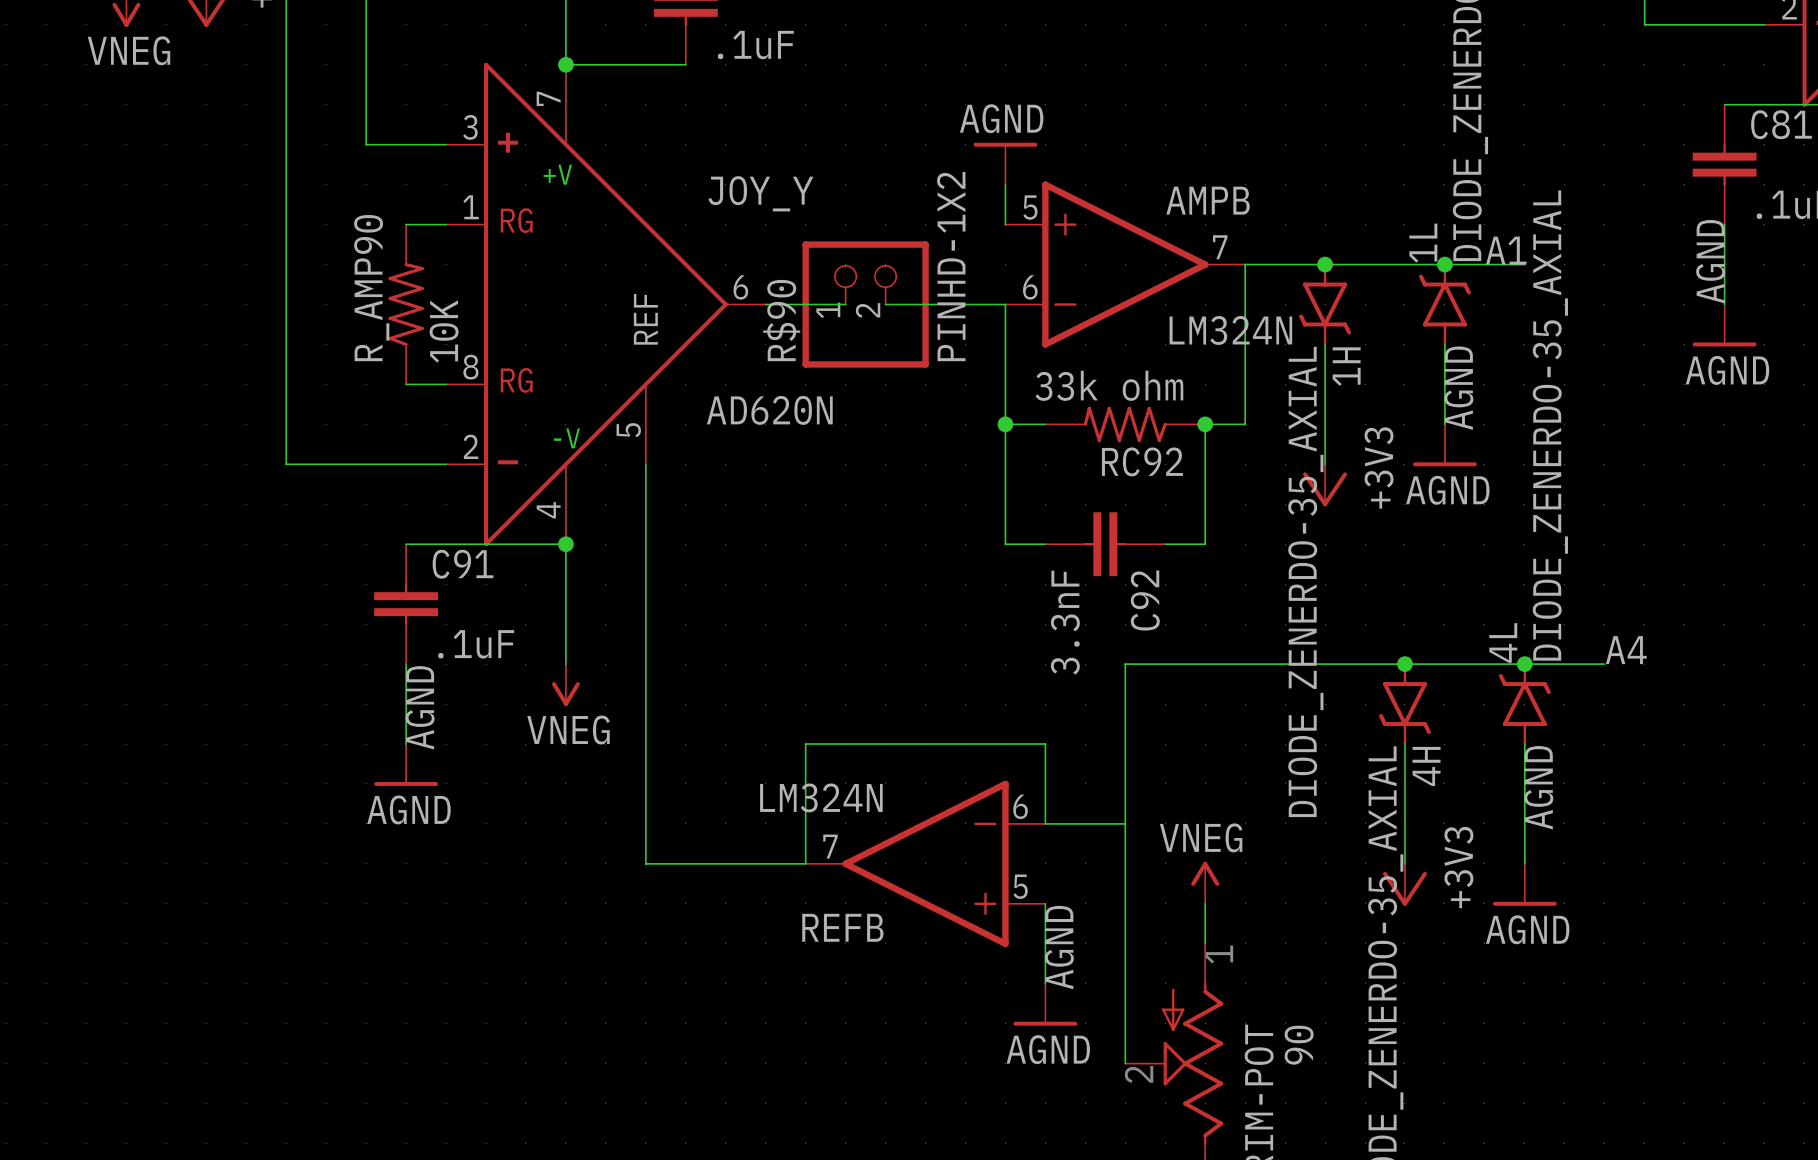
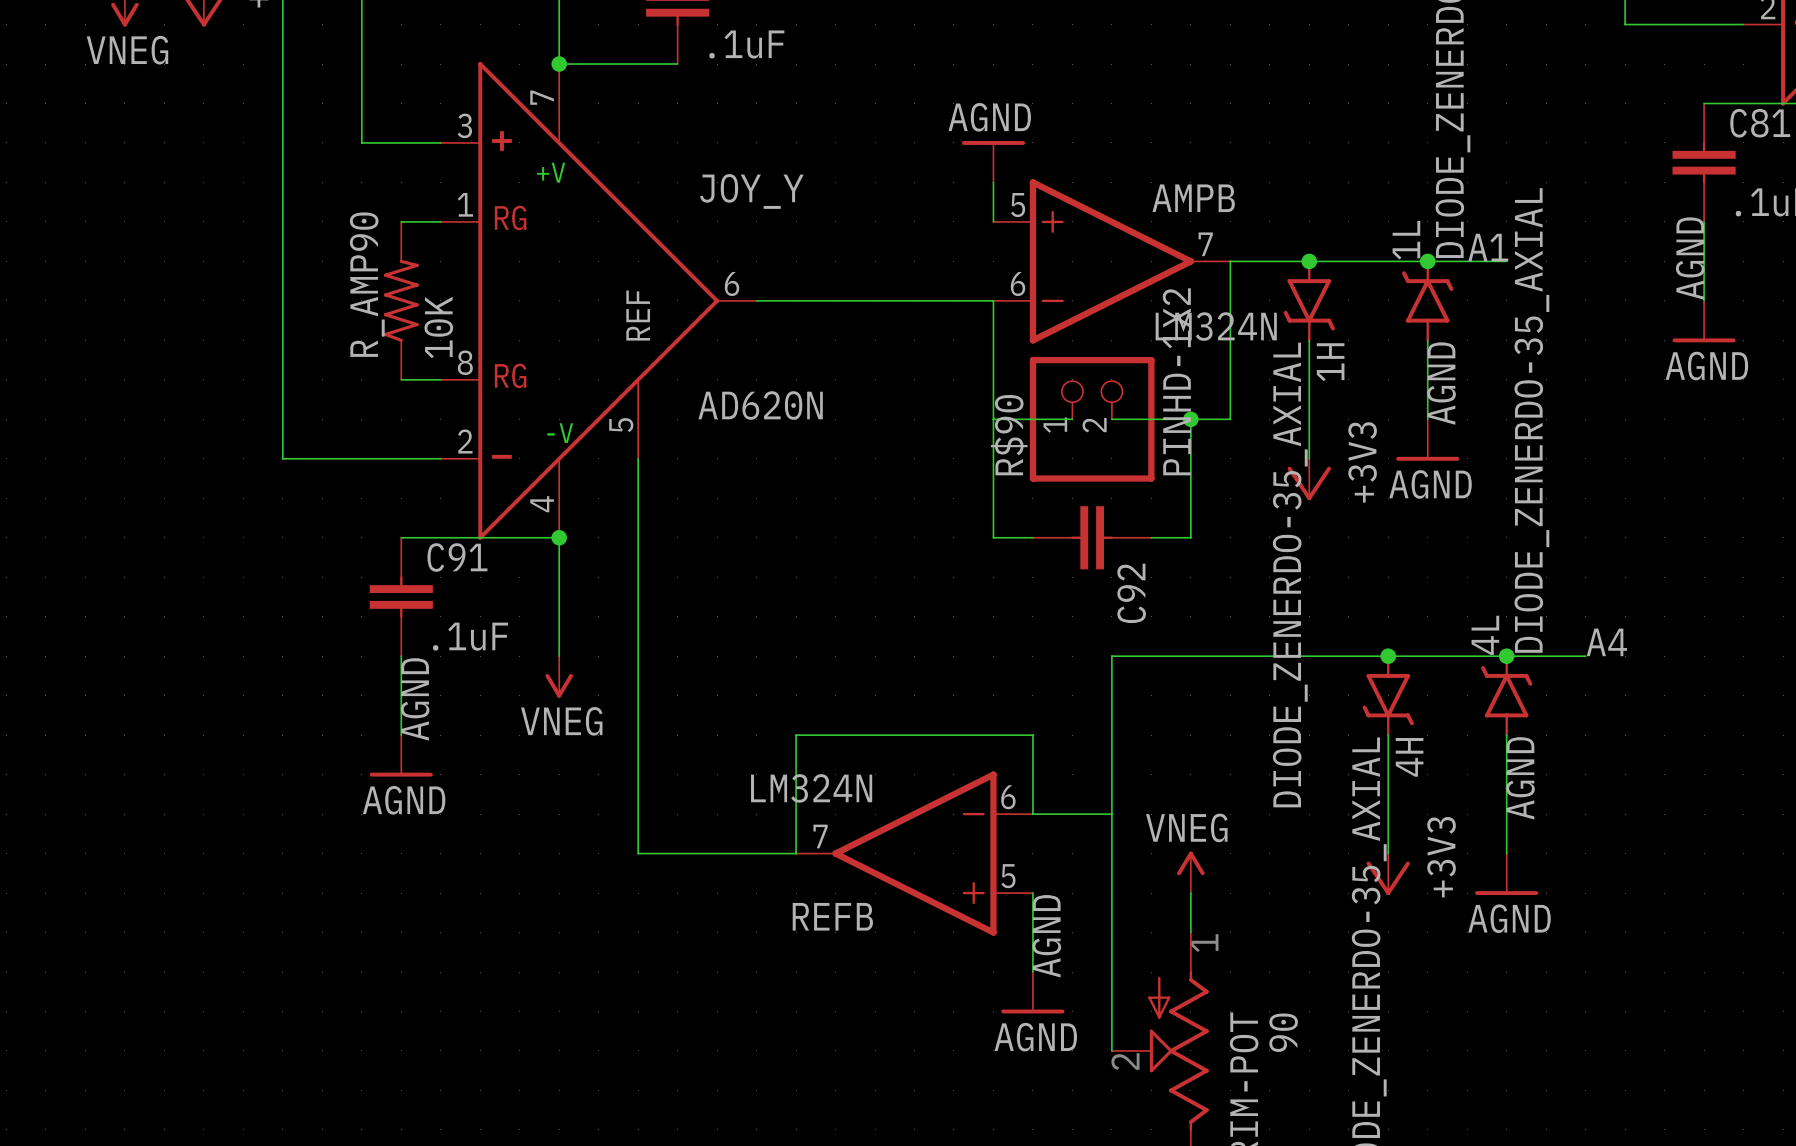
wire: none -> (835, 300) (875, 300)
R$90 position: (865, 304) -> (1092, 419)
junction: (1005, 424) -> none
RC92: 33k ohm (1125, 424) -> none
C92 value: 3.3nF (1065, 622) -> none

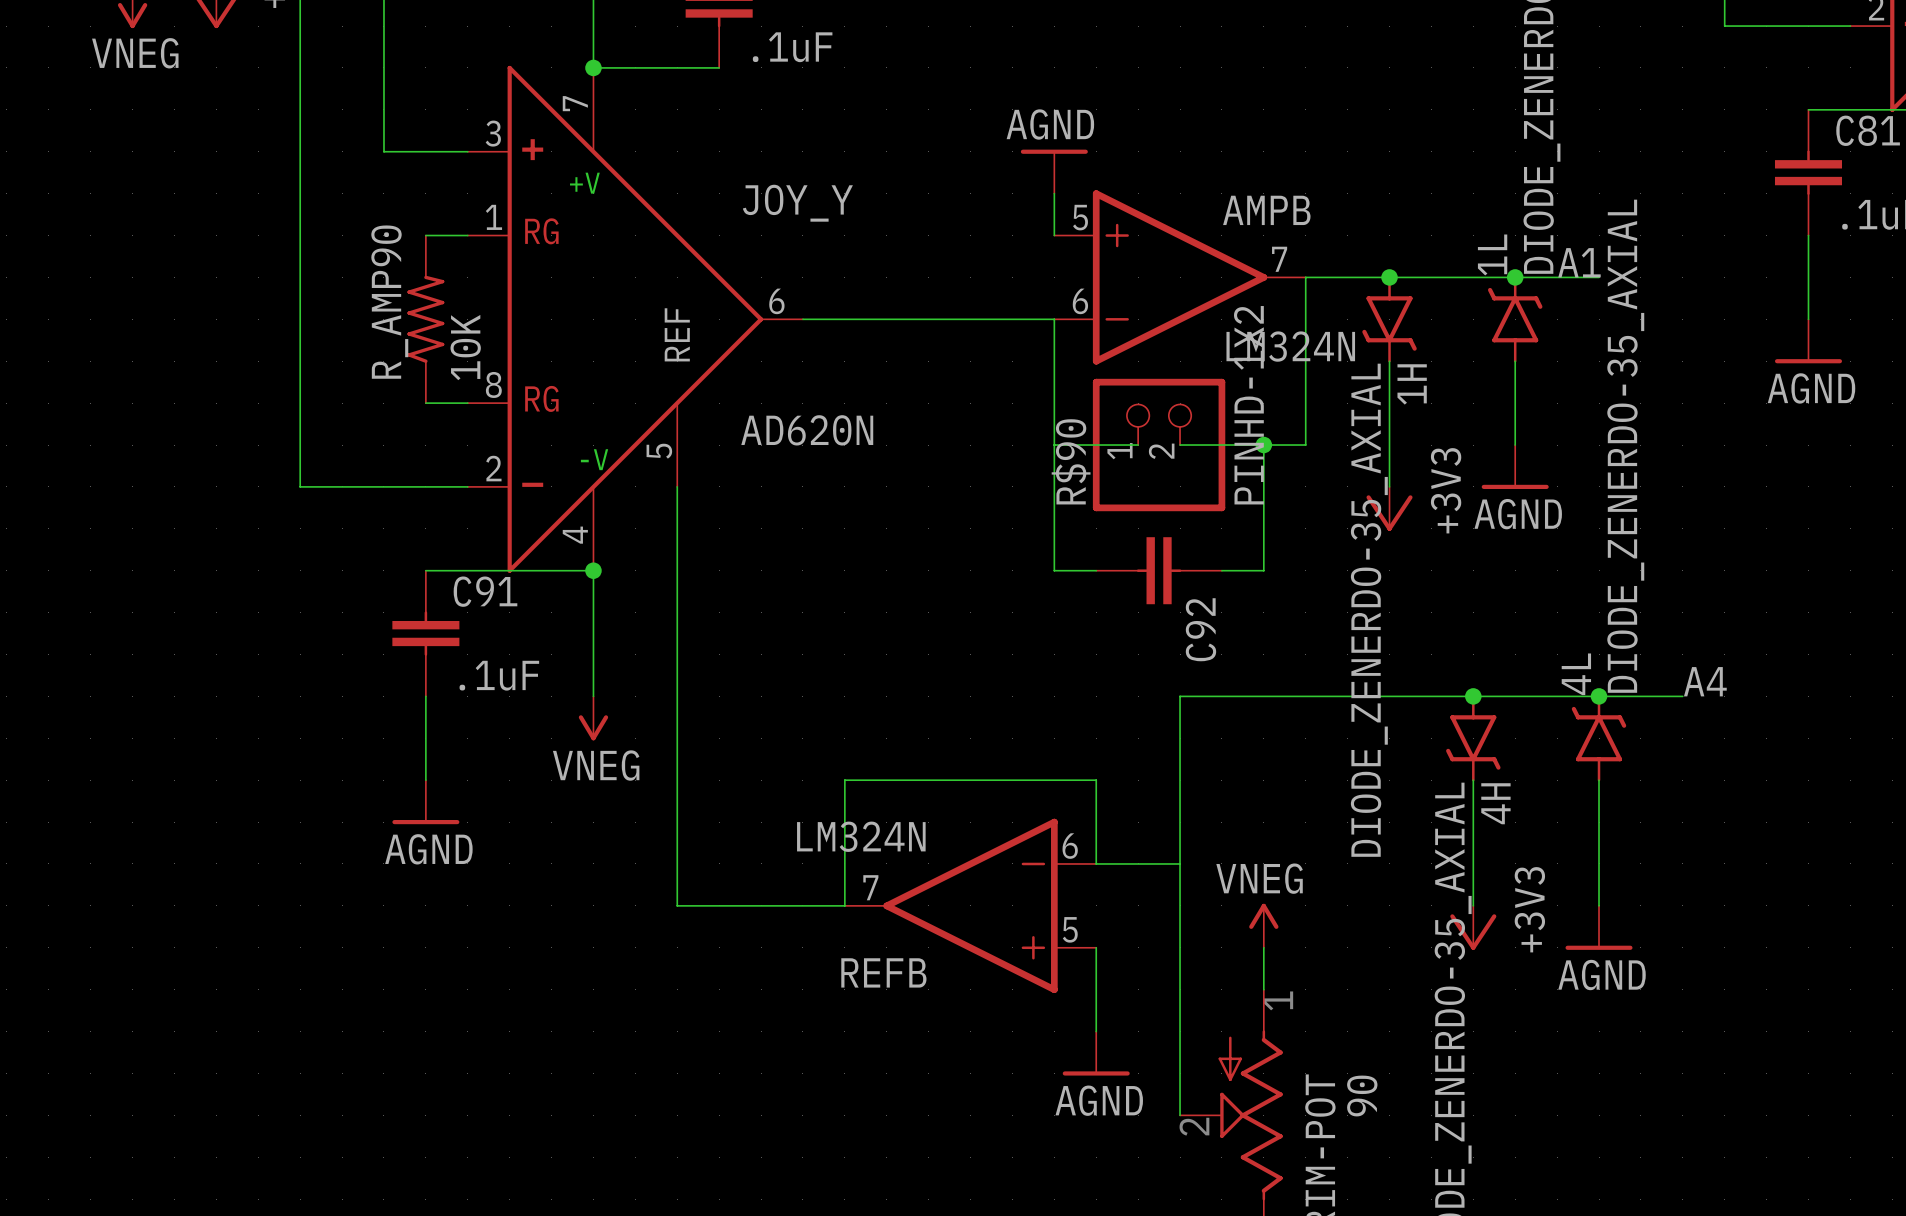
label: AGND (1690, 258) -> none
label: AGND (1441, 383) -> none
label: AGND (415, 699) -> none
label: AGND (1520, 778) -> none
label: AGND (1046, 936) -> none

